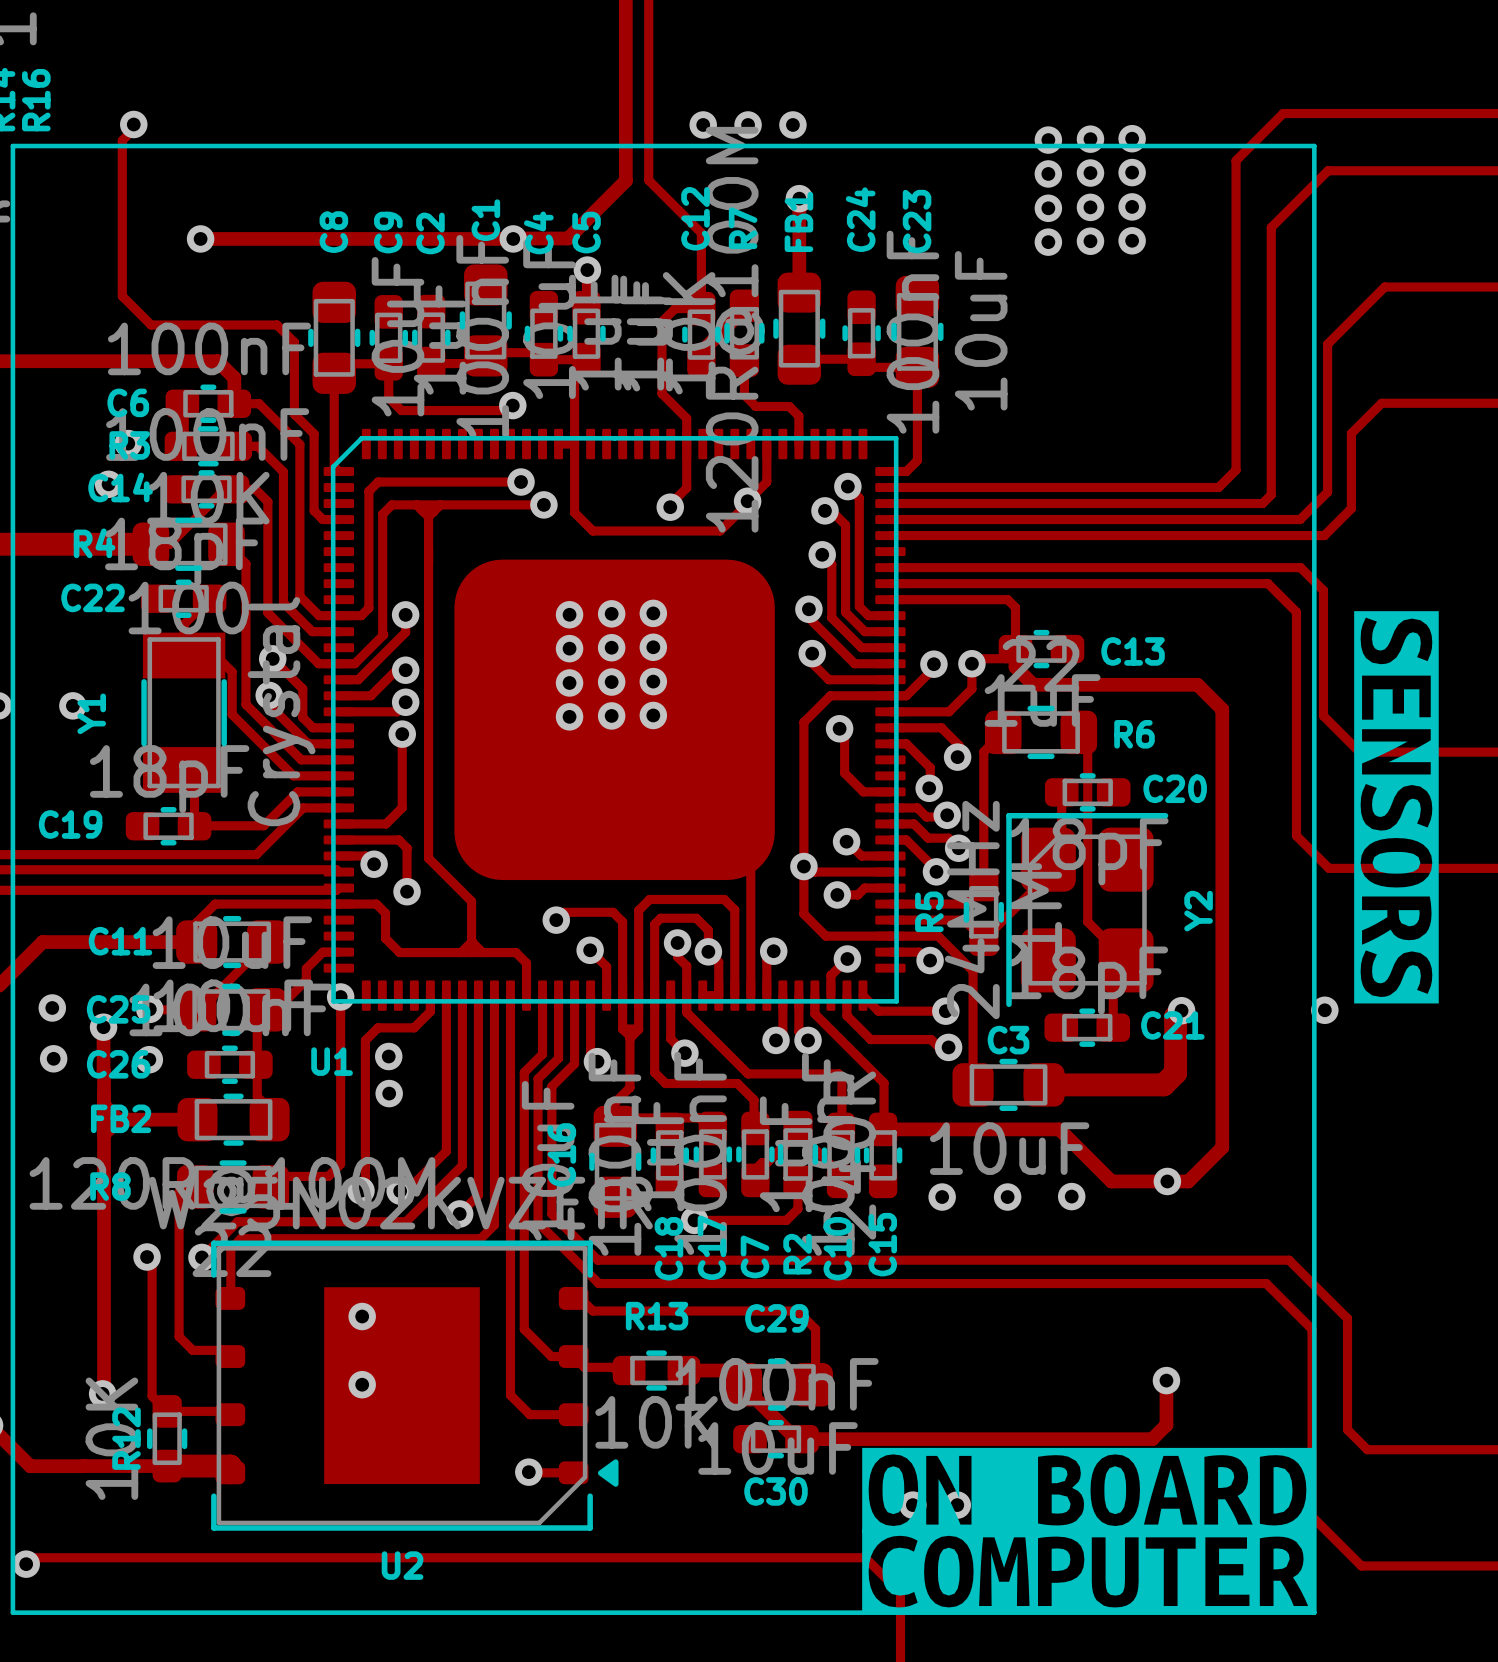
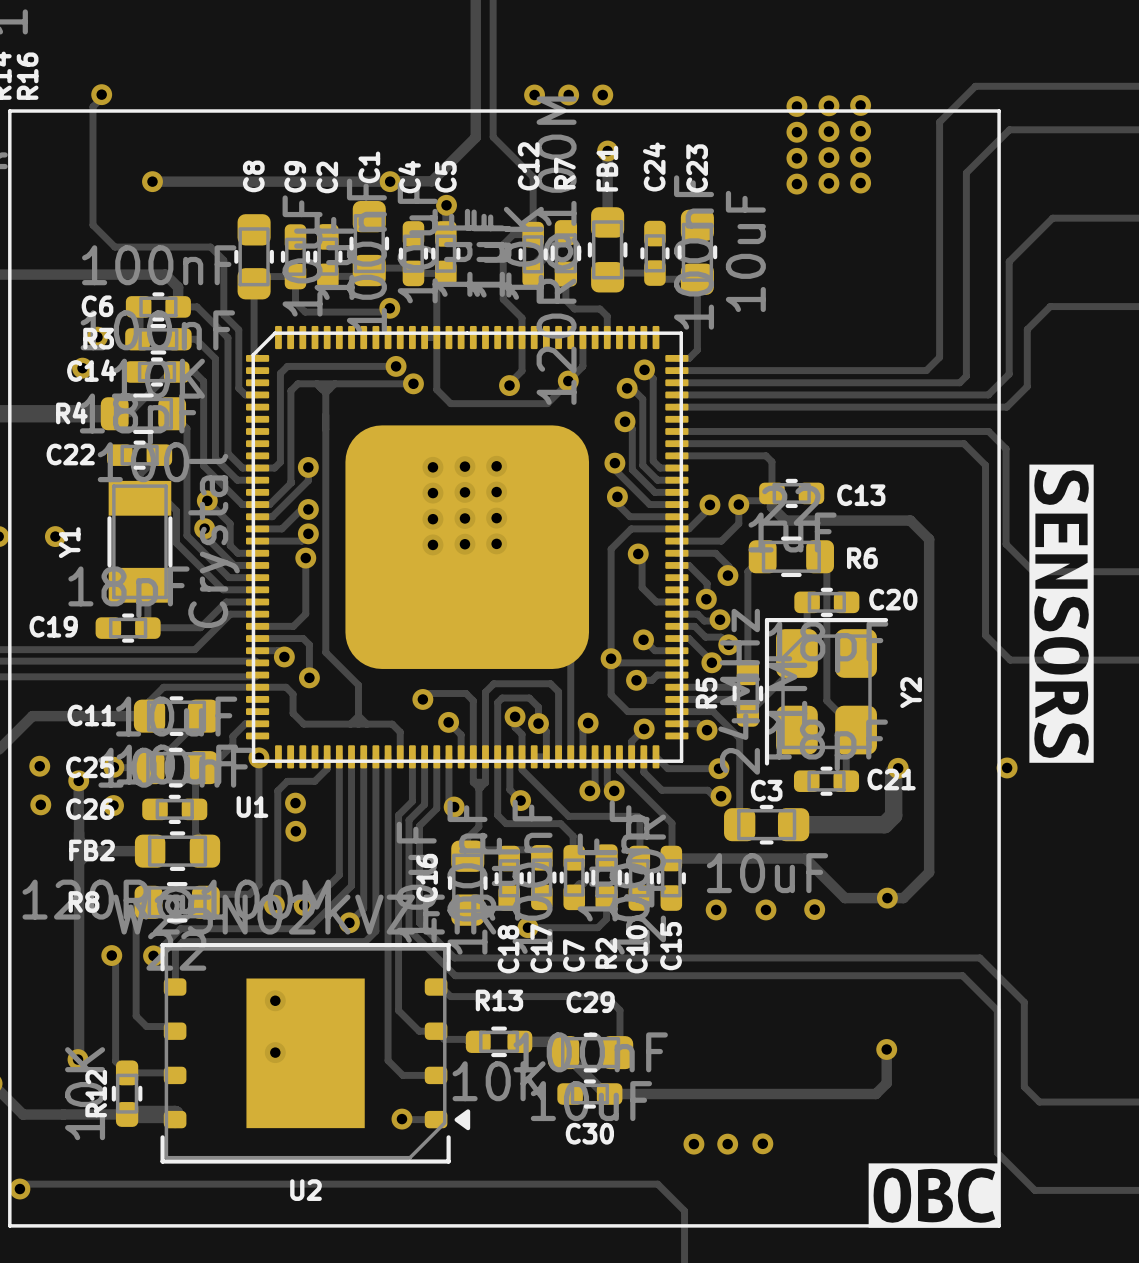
drawing: [862, 1447, 1315, 1614] -> none
drawing: none -> [868, 1163, 1001, 1228]

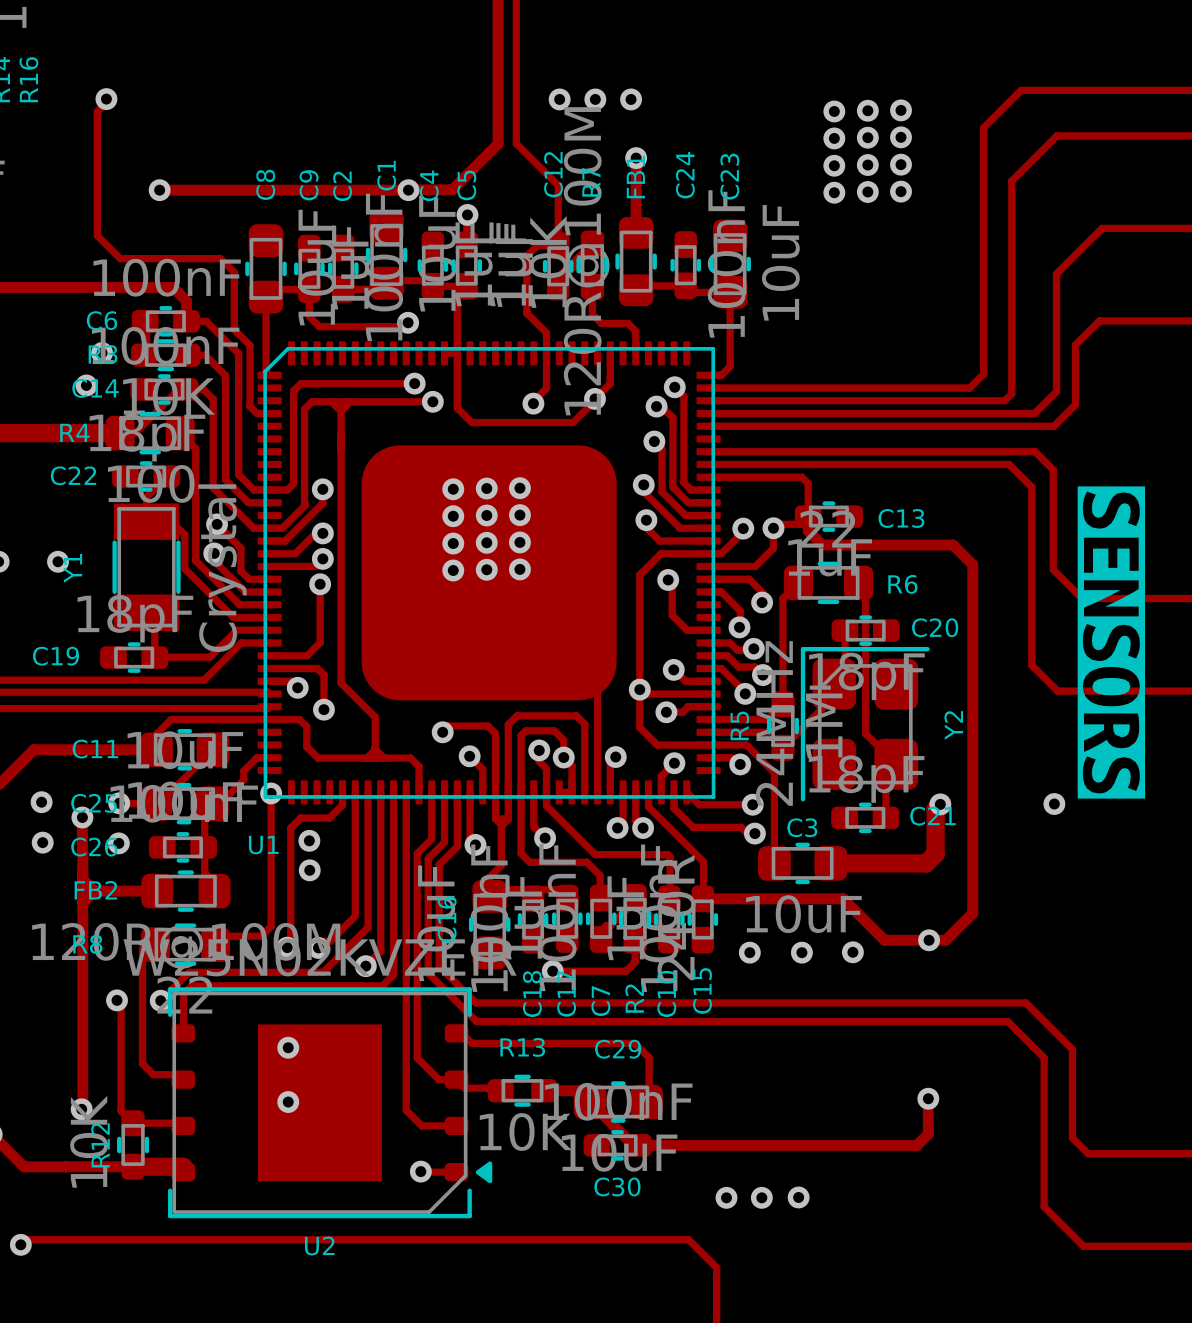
line: (9, 111) (999, 111) (999, 1225) (9, 1225) (9, 111) -> none
drawing: [868, 1163, 1001, 1228] -> none

